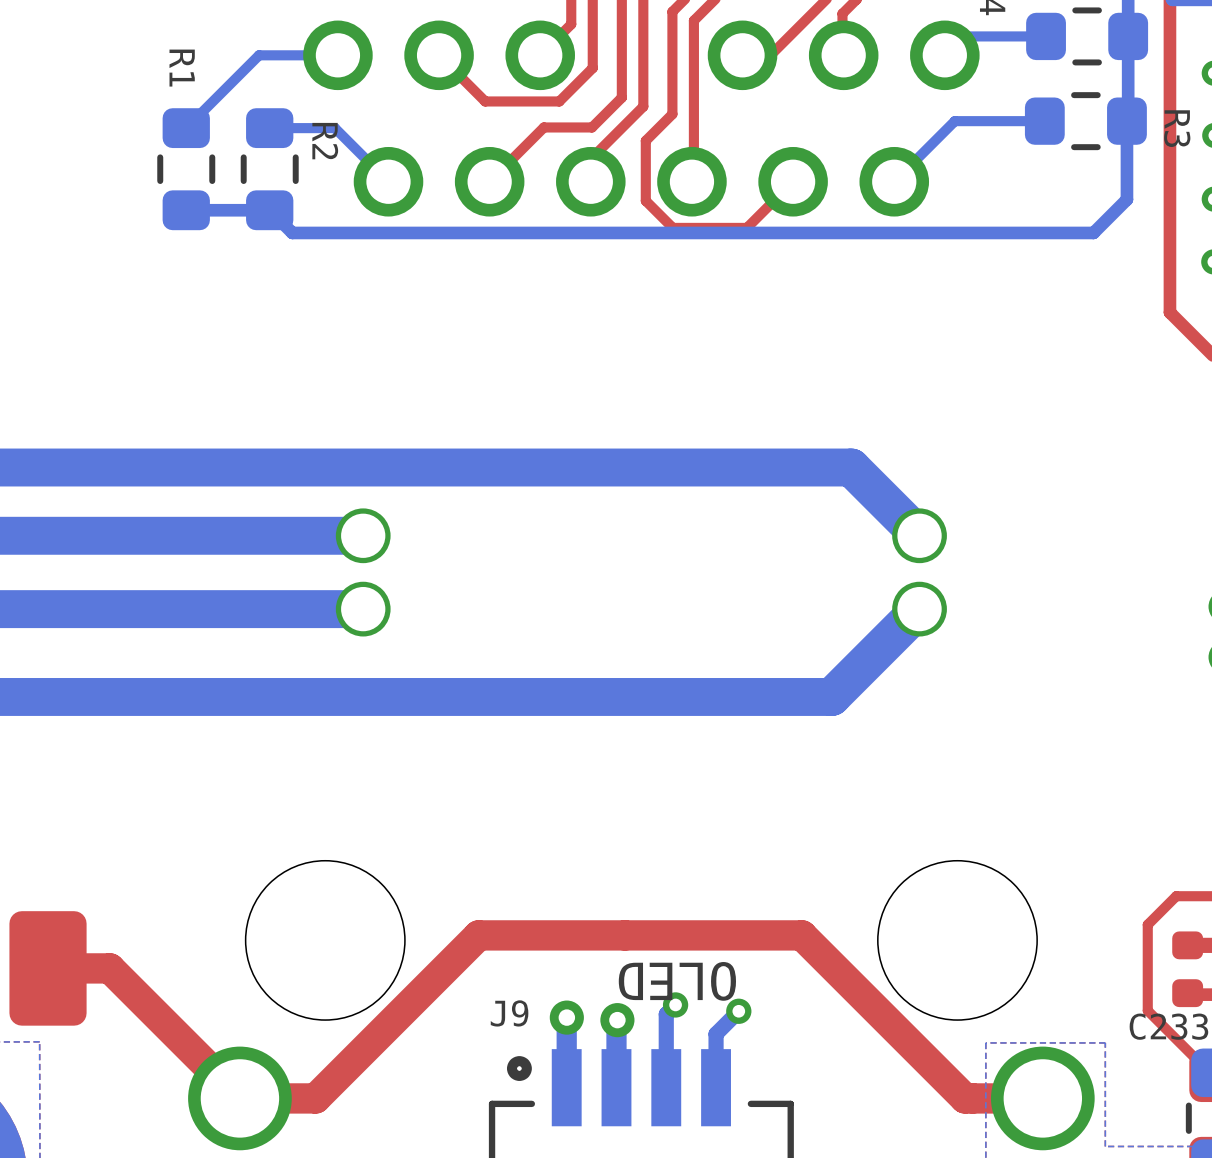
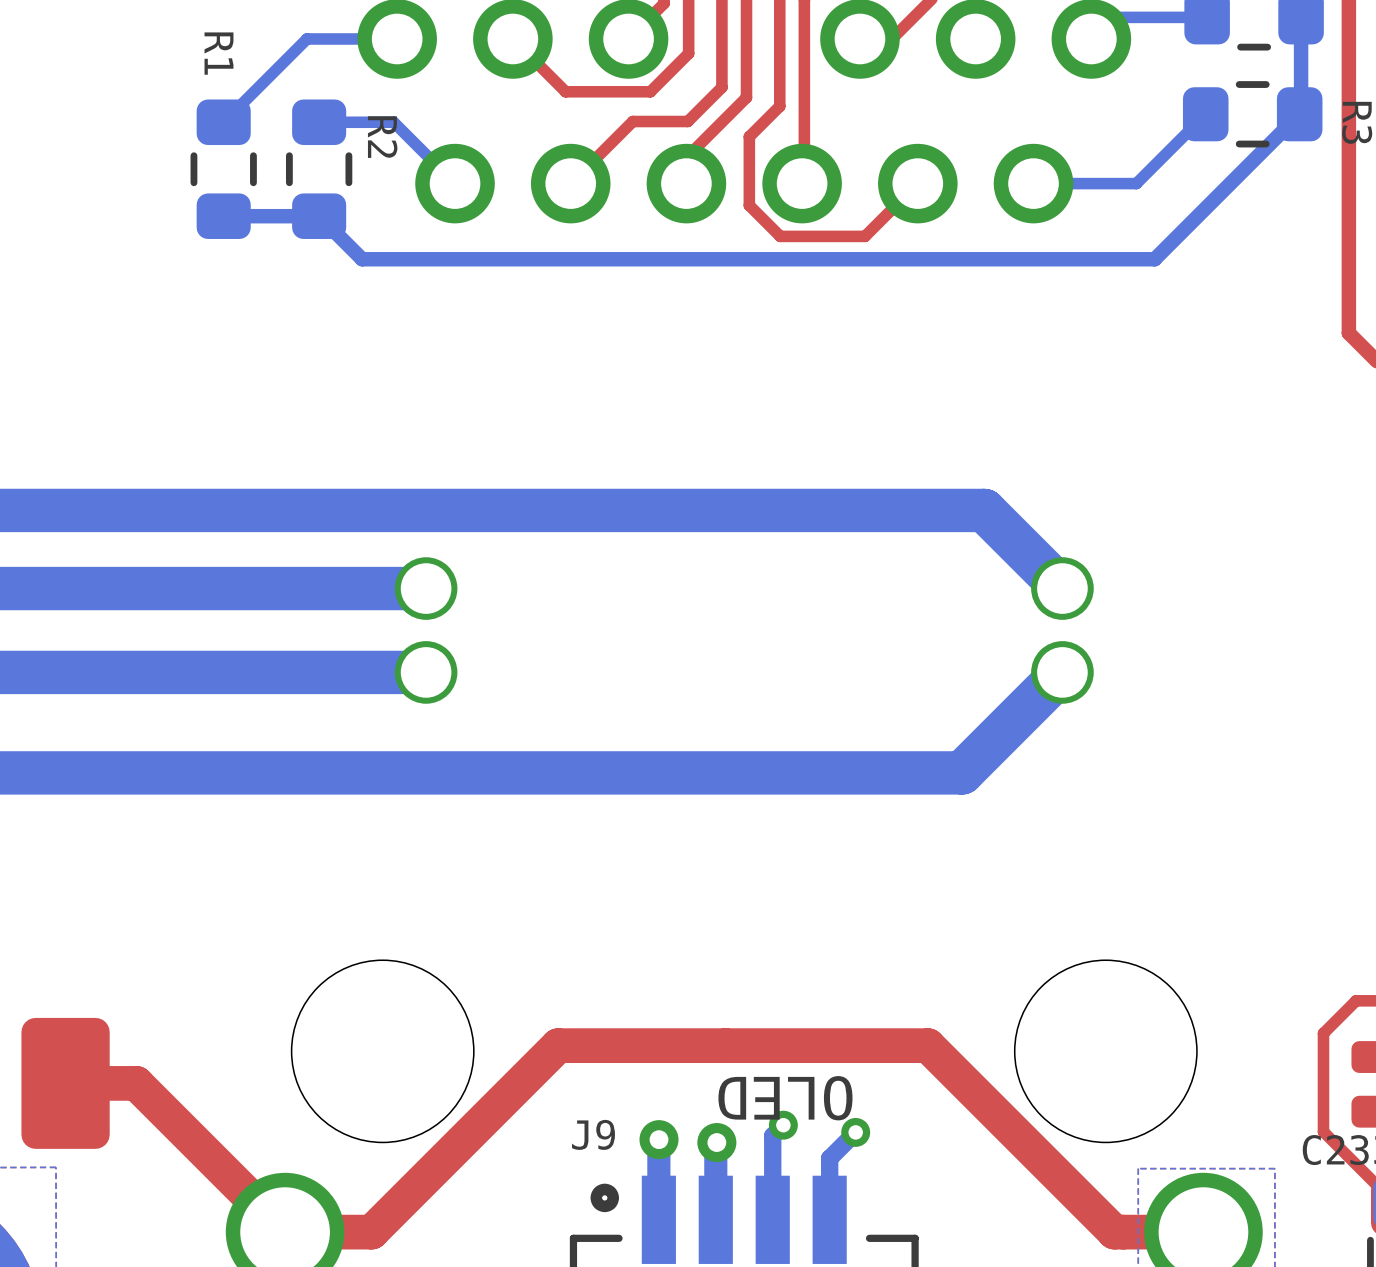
bottom track: (1044, 121) (954, 121) (894, 181) -> (1205, 114) (1136, 183) (1033, 183)
bottom track: (1126, 121) (1126, 199) (1093, 232) (292, 232) -> (1299, 114) (1154, 259) (362, 259) (345, 242)

